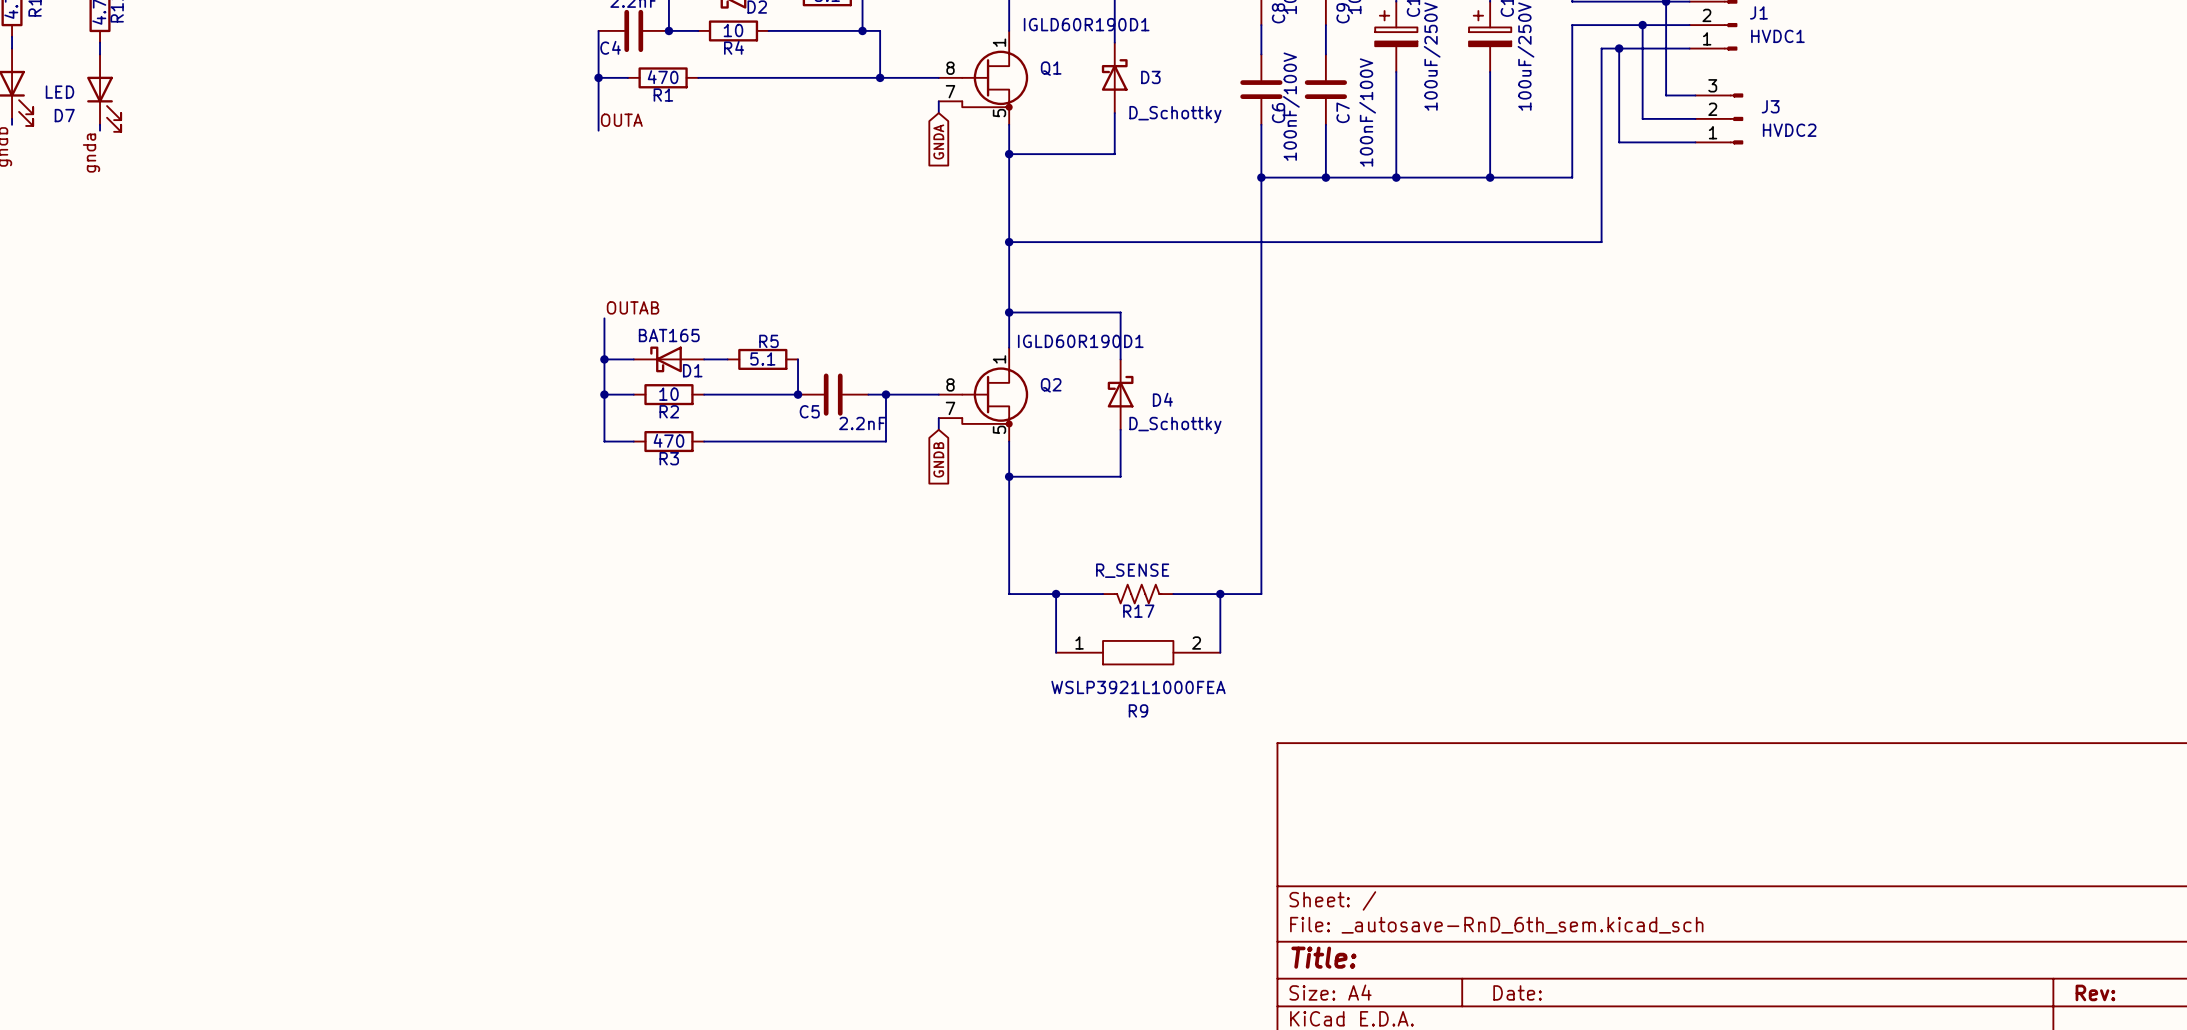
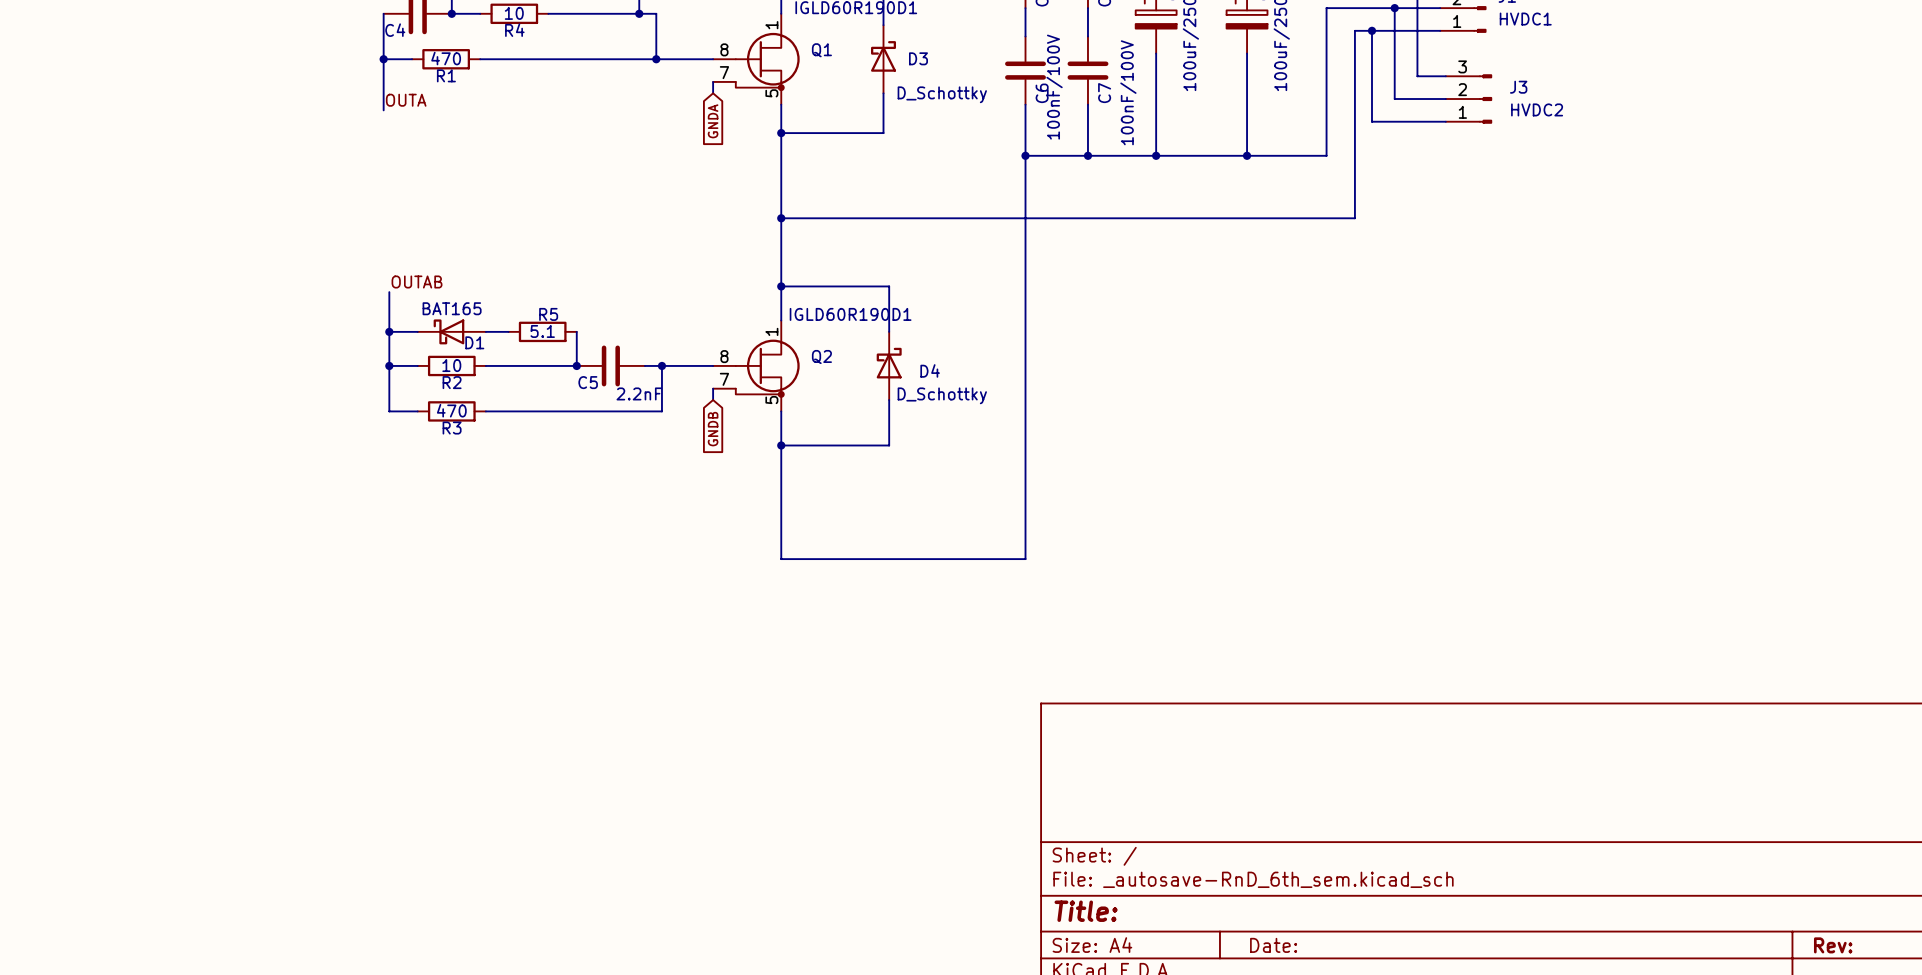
wire: (1056, 594) (1056, 652) -> none
junction: (1056, 594) -> none
R17: R_SENSE (1138, 594) -> none
wire: (1220, 594) (1220, 652) -> none
junction: (1220, 594) -> none
R9: WSLP3921L1000FEA (1138, 652) -> none

